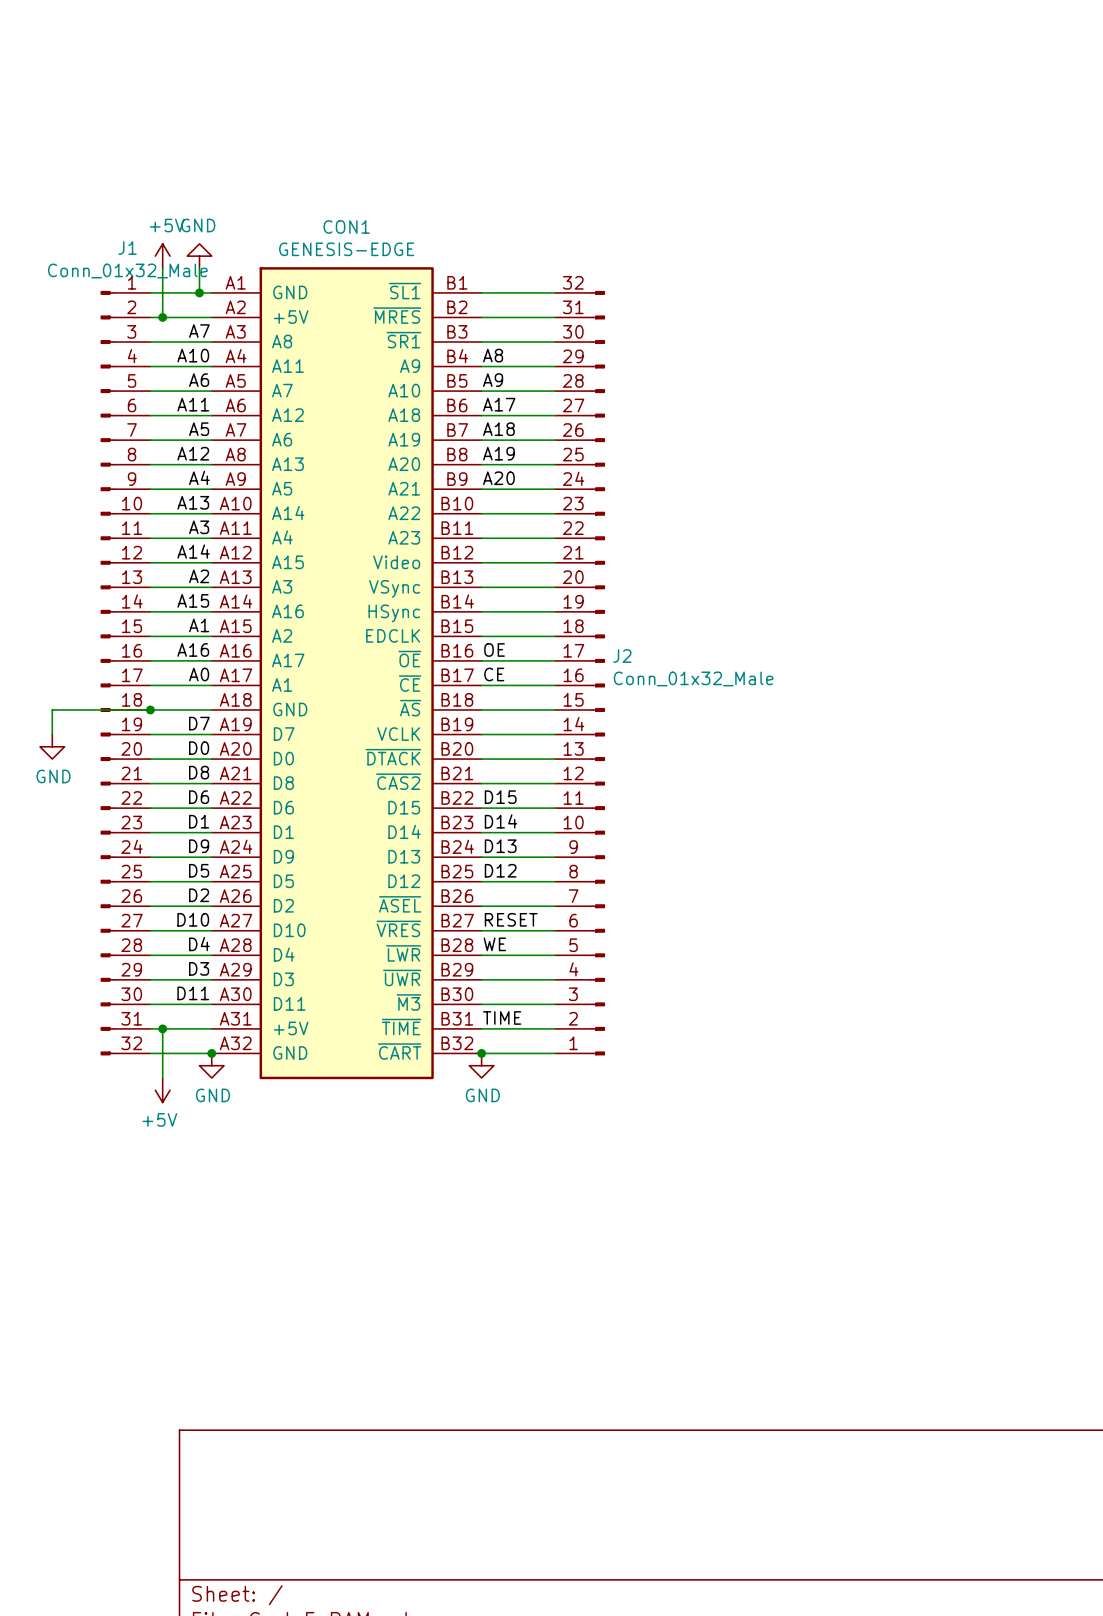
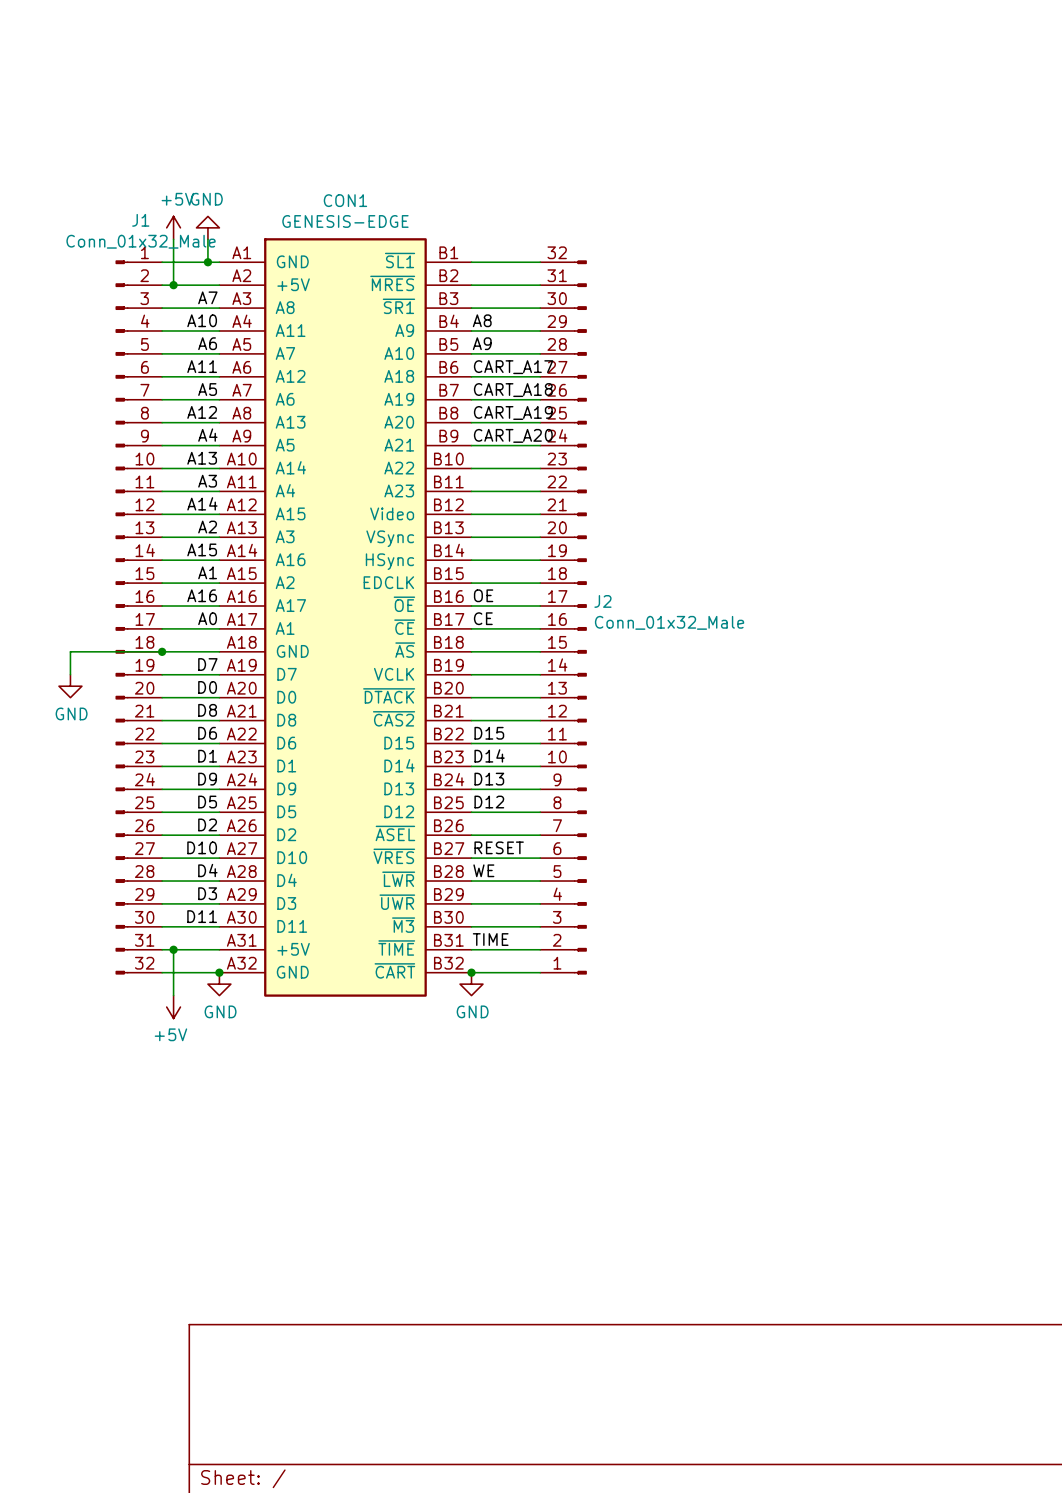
label: A17 (499, 404) -> CART_A17 (513, 367)
label: A18 (498, 429) -> CART_A18 (513, 390)
label: A19 (498, 453) -> CART_A19 (513, 412)
label: A20 (498, 478) -> CART_A20 (513, 435)

